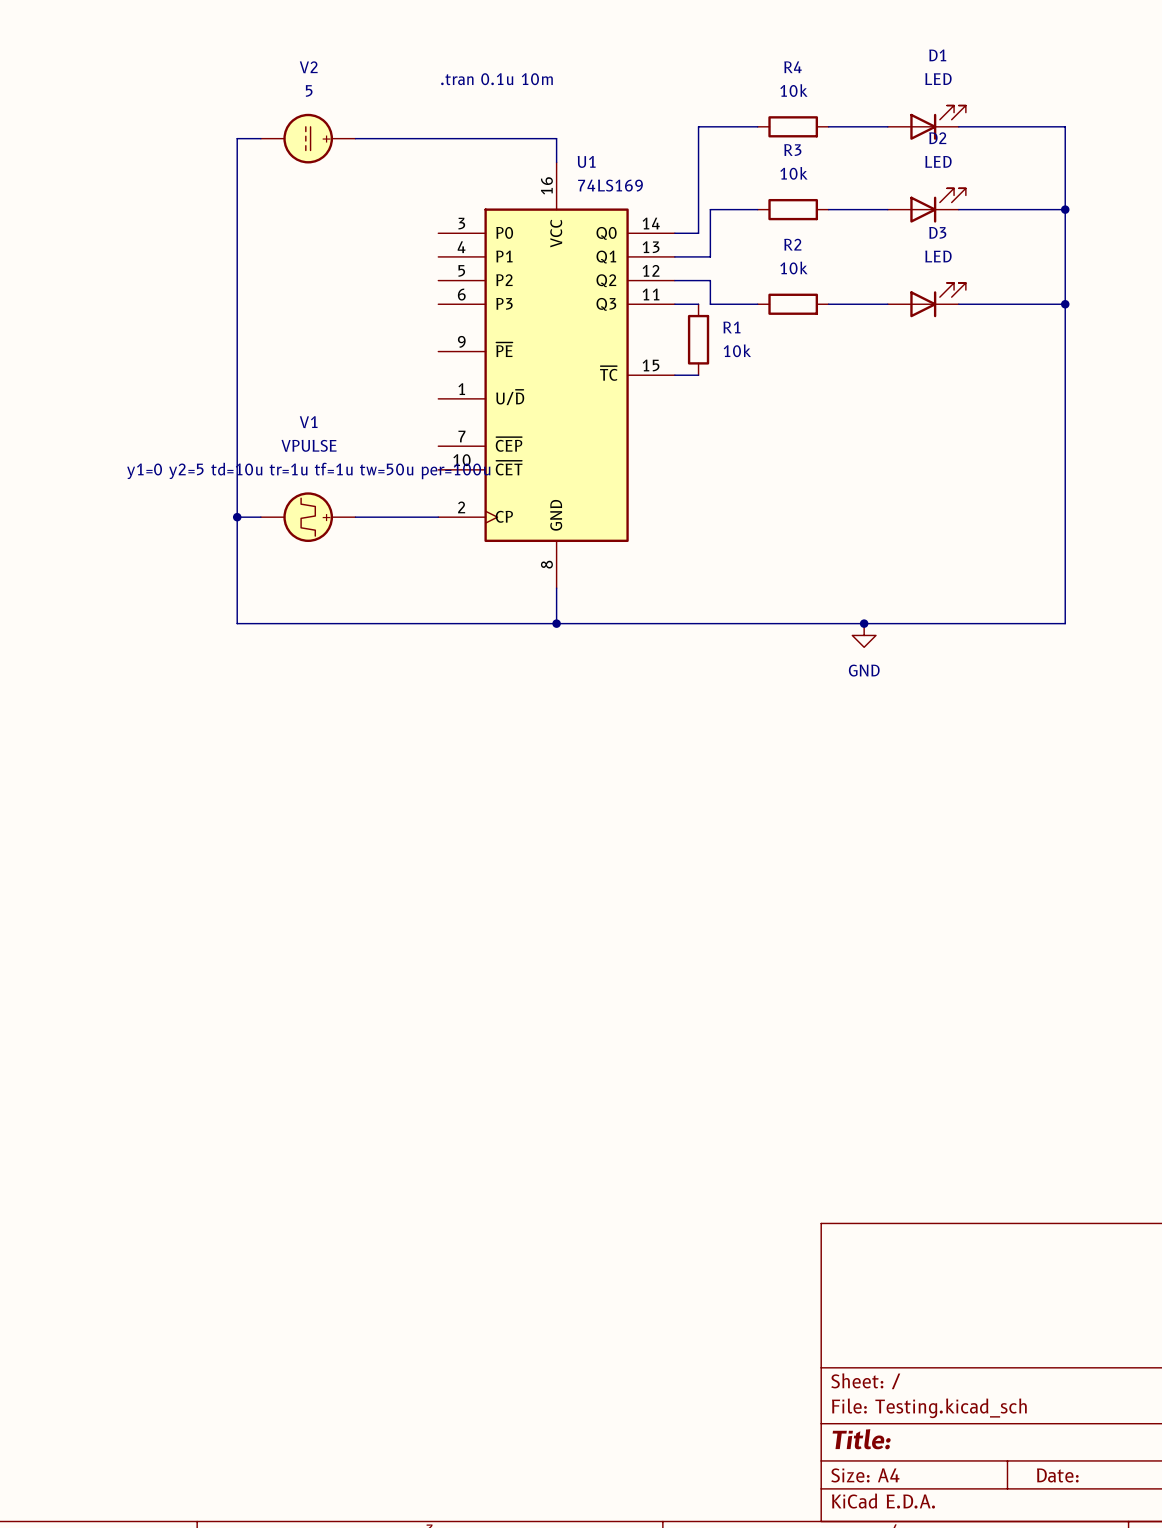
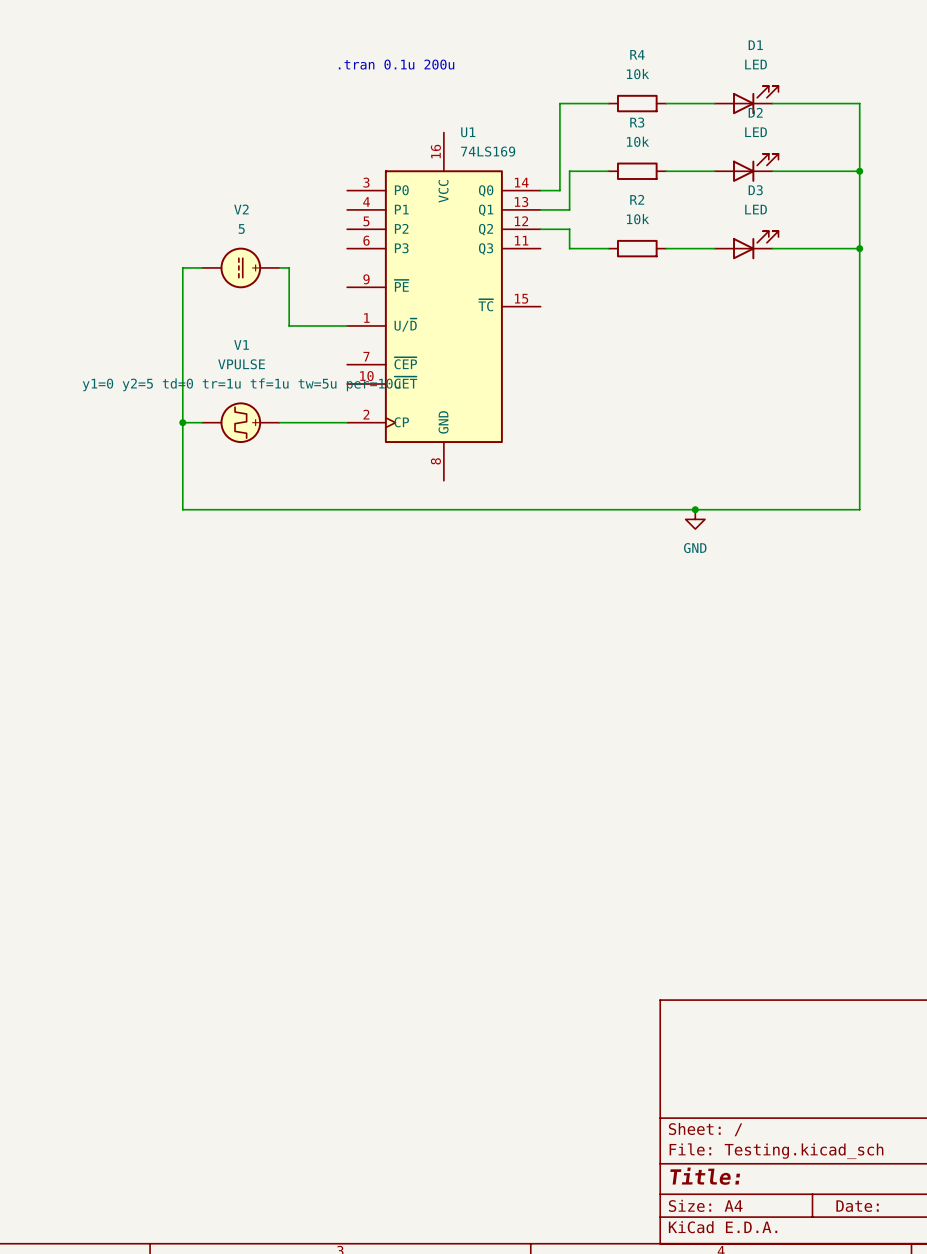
text: .tran 0.1u 10m (496, 79) -> .tran 0.1u 200u (396, 64)
wire: (260, 138) (237, 138) (237, 327) -> (202, 267) (182, 267)
V2 position: (308, 138) -> (240, 267)
wire: (355, 138) (556, 138) (556, 162) -> none
wire: (674, 304) (698, 304) -> none
wire: none -> (279, 267) (289, 267) (289, 325) (347, 325)
R1: 10k (698, 339) -> none
wire: (674, 375) (698, 375) -> none
V1 text: y1=0 y2=5 td=10u tr=1u tf=1u tw=50u per=100u (308, 470) -> y1=0 y2=5 td=0 tr=1u tf=1u tw=5u per=10u (241, 384)
wire: (556, 588) (556, 623) -> none
junction: (556, 623) -> none

